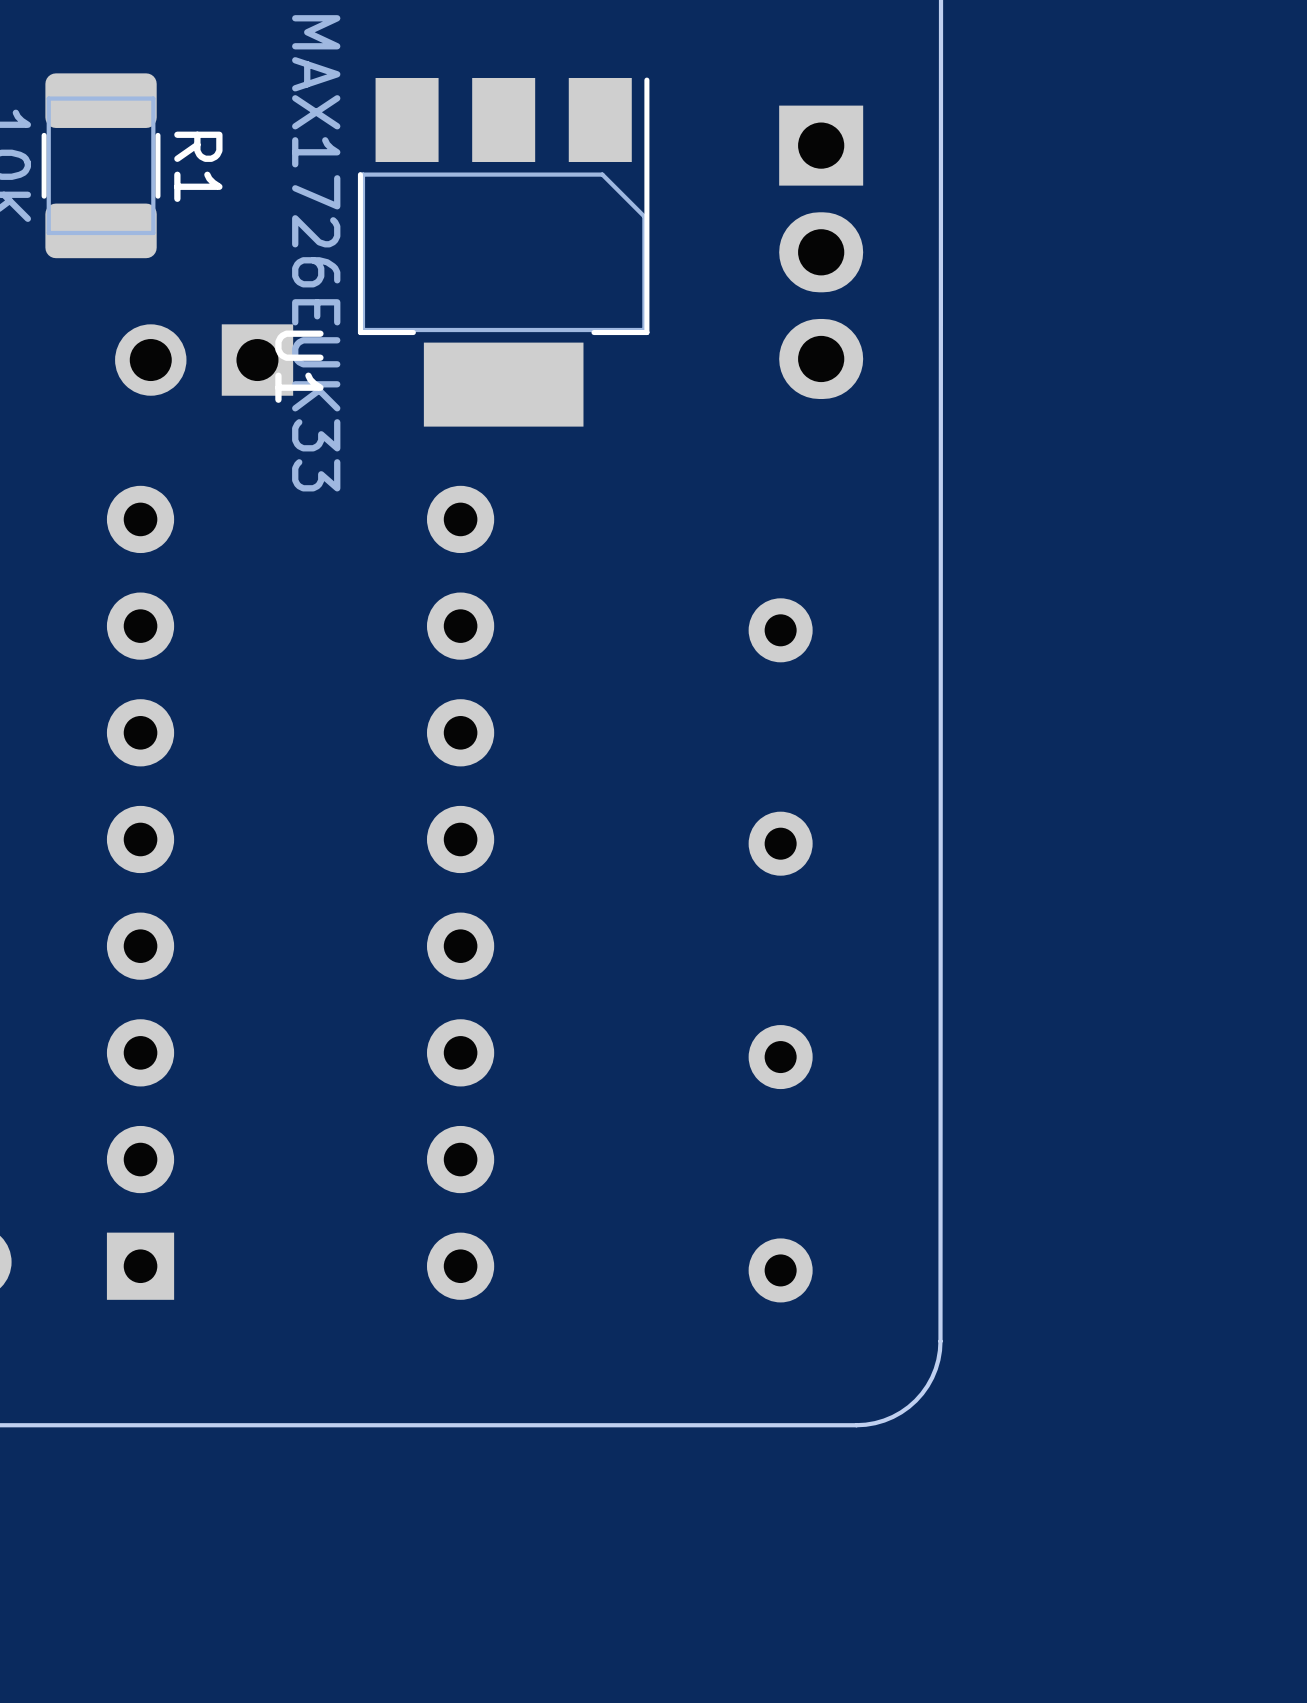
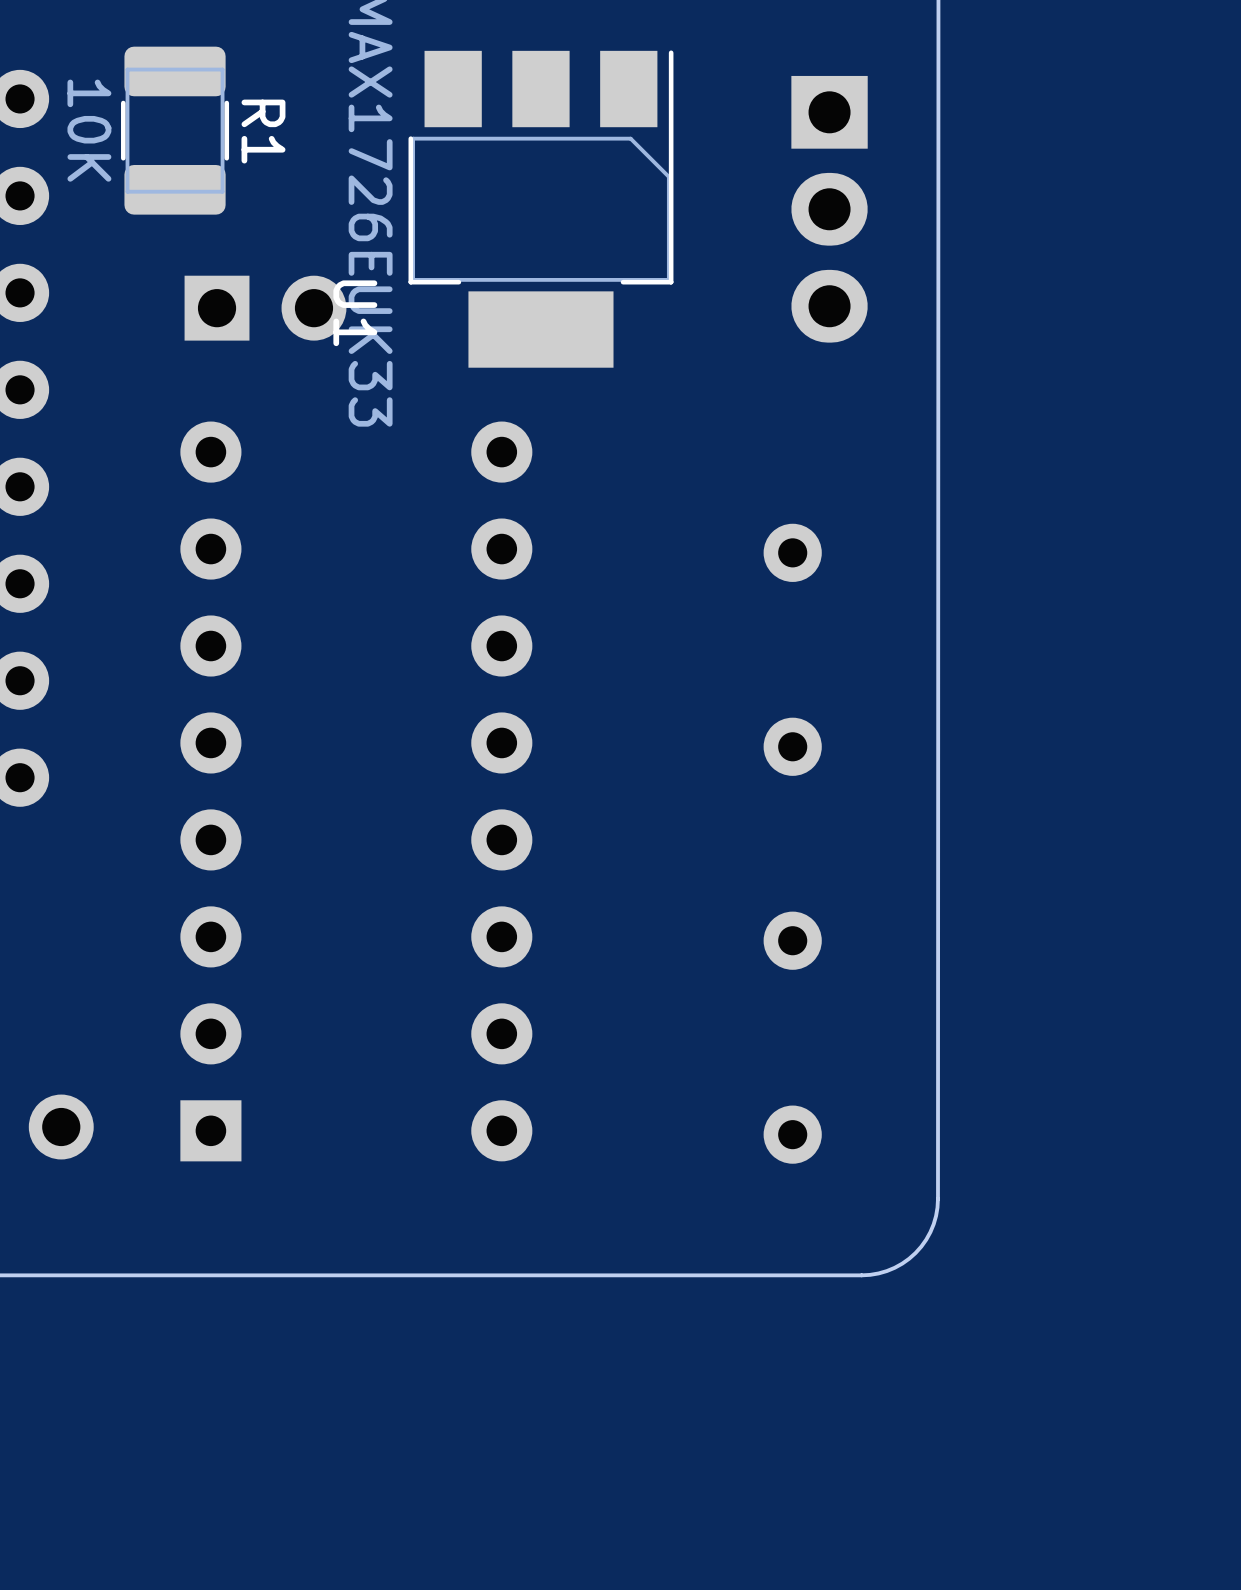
part rotation: 0° (204, 360) -> 180° (265, 308)

